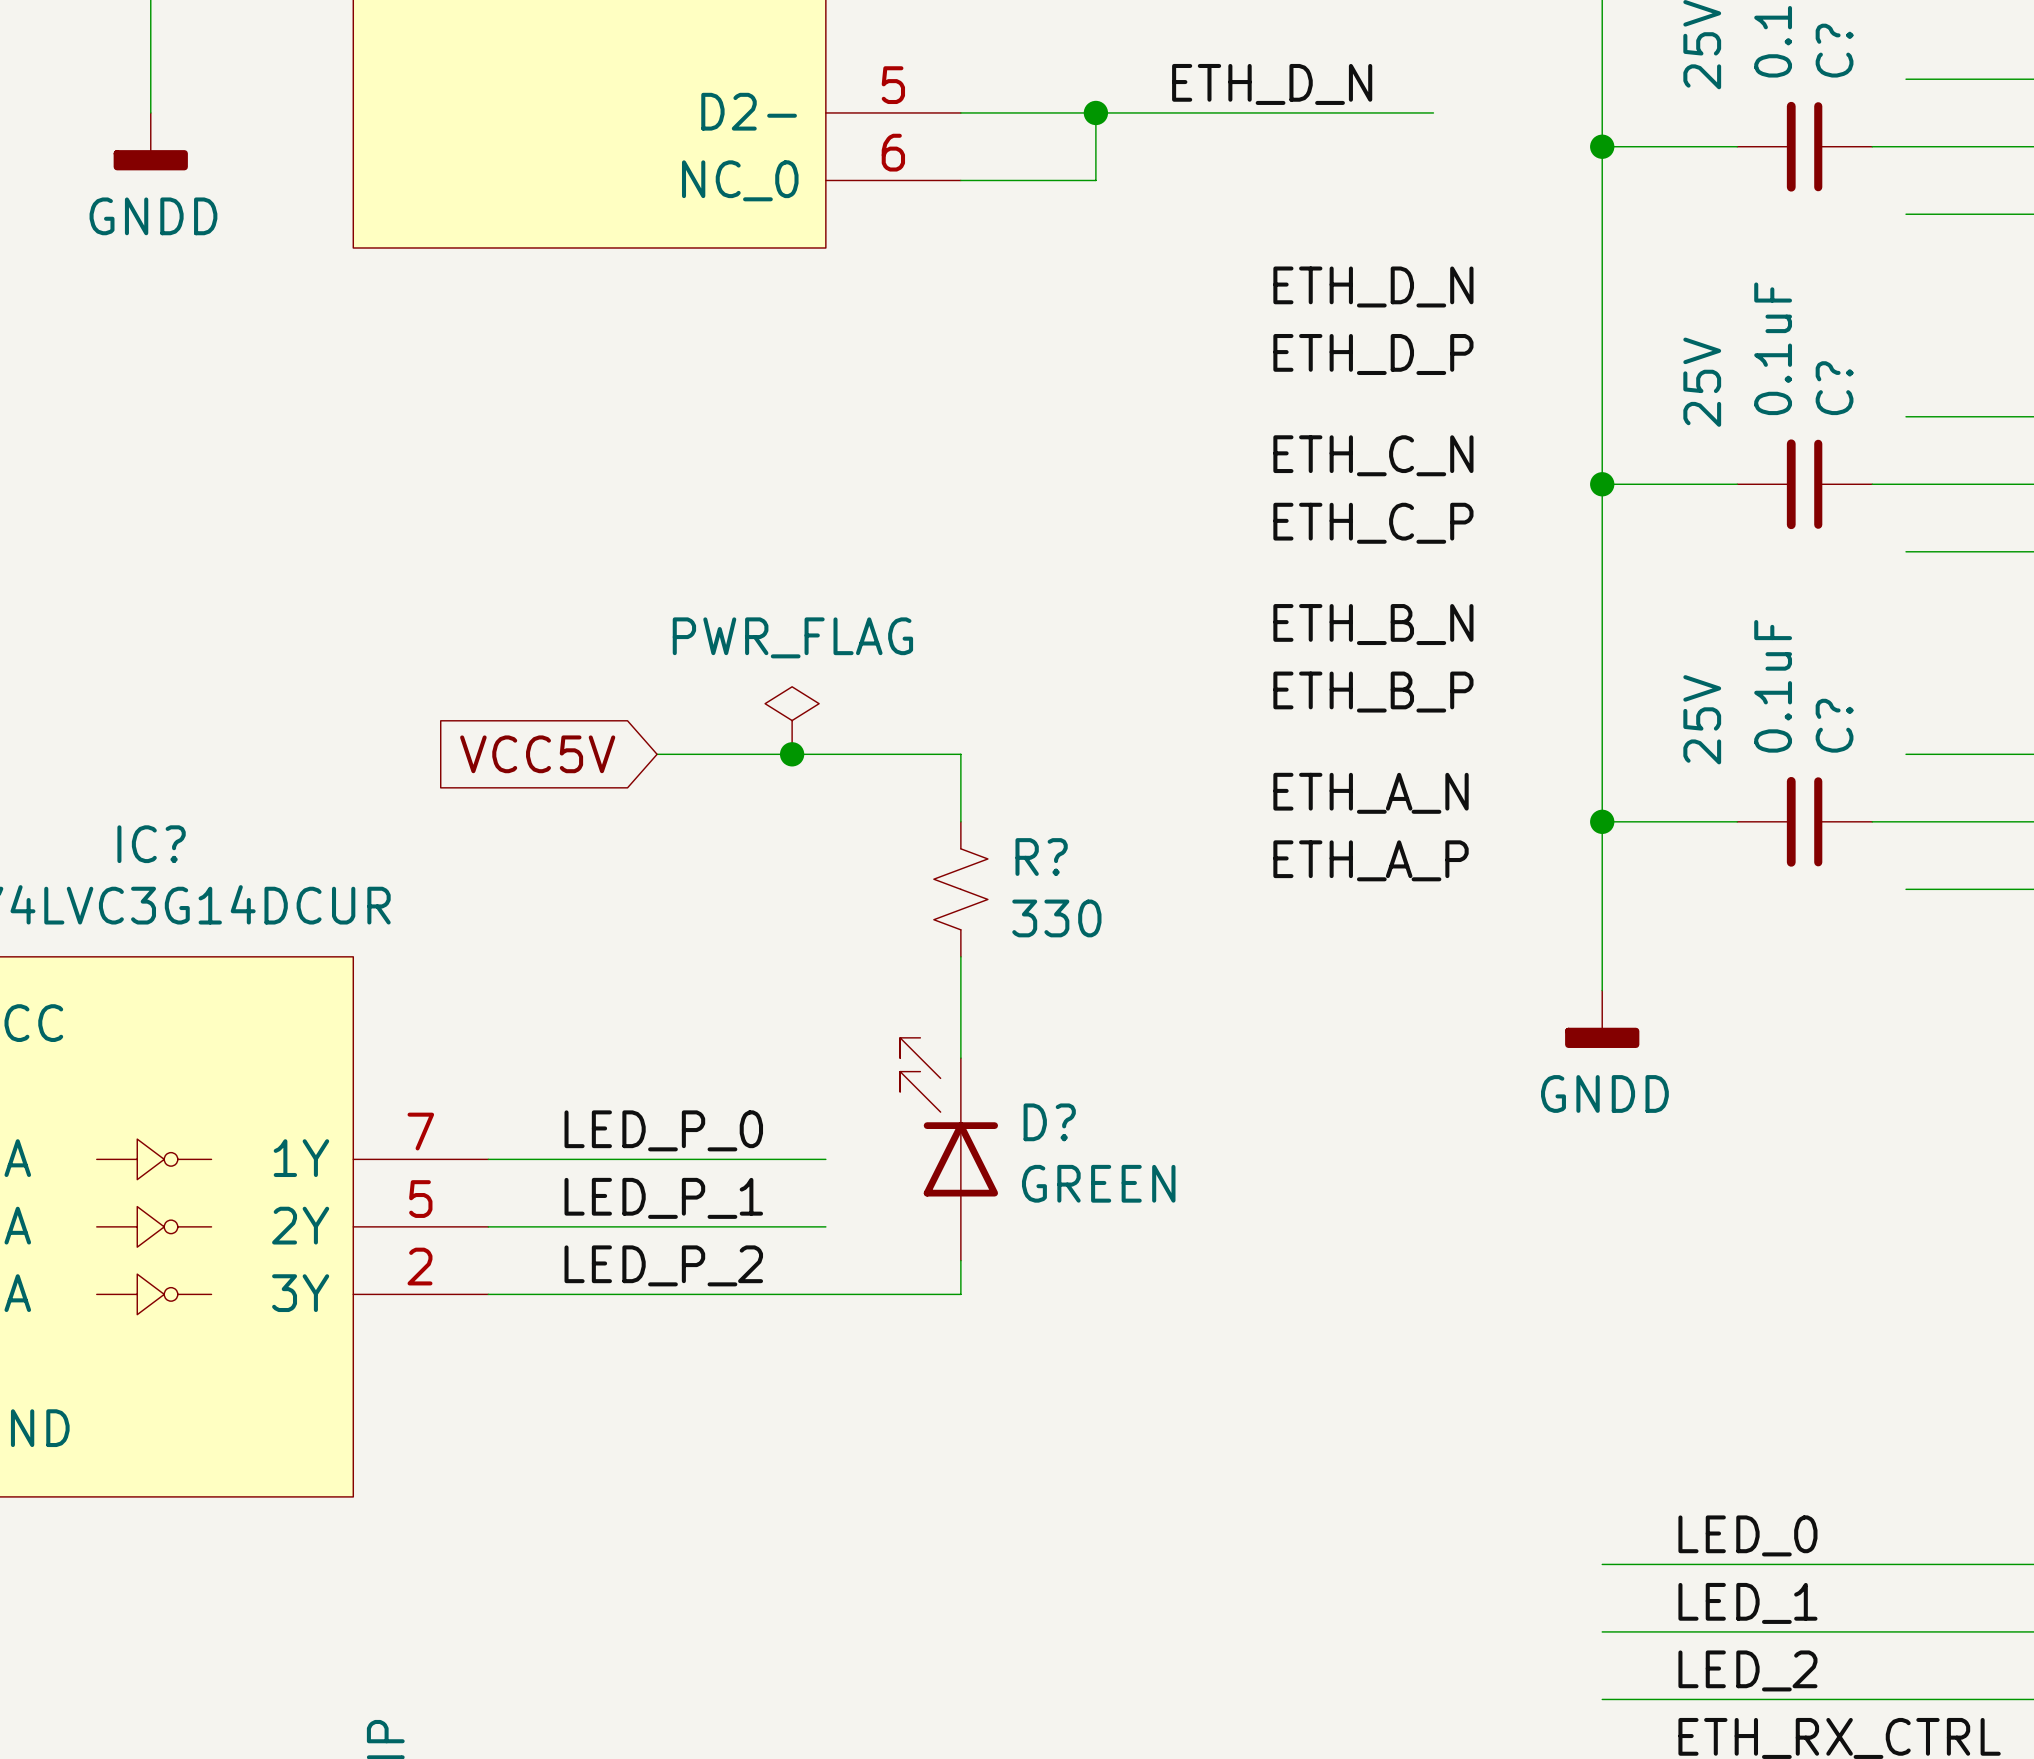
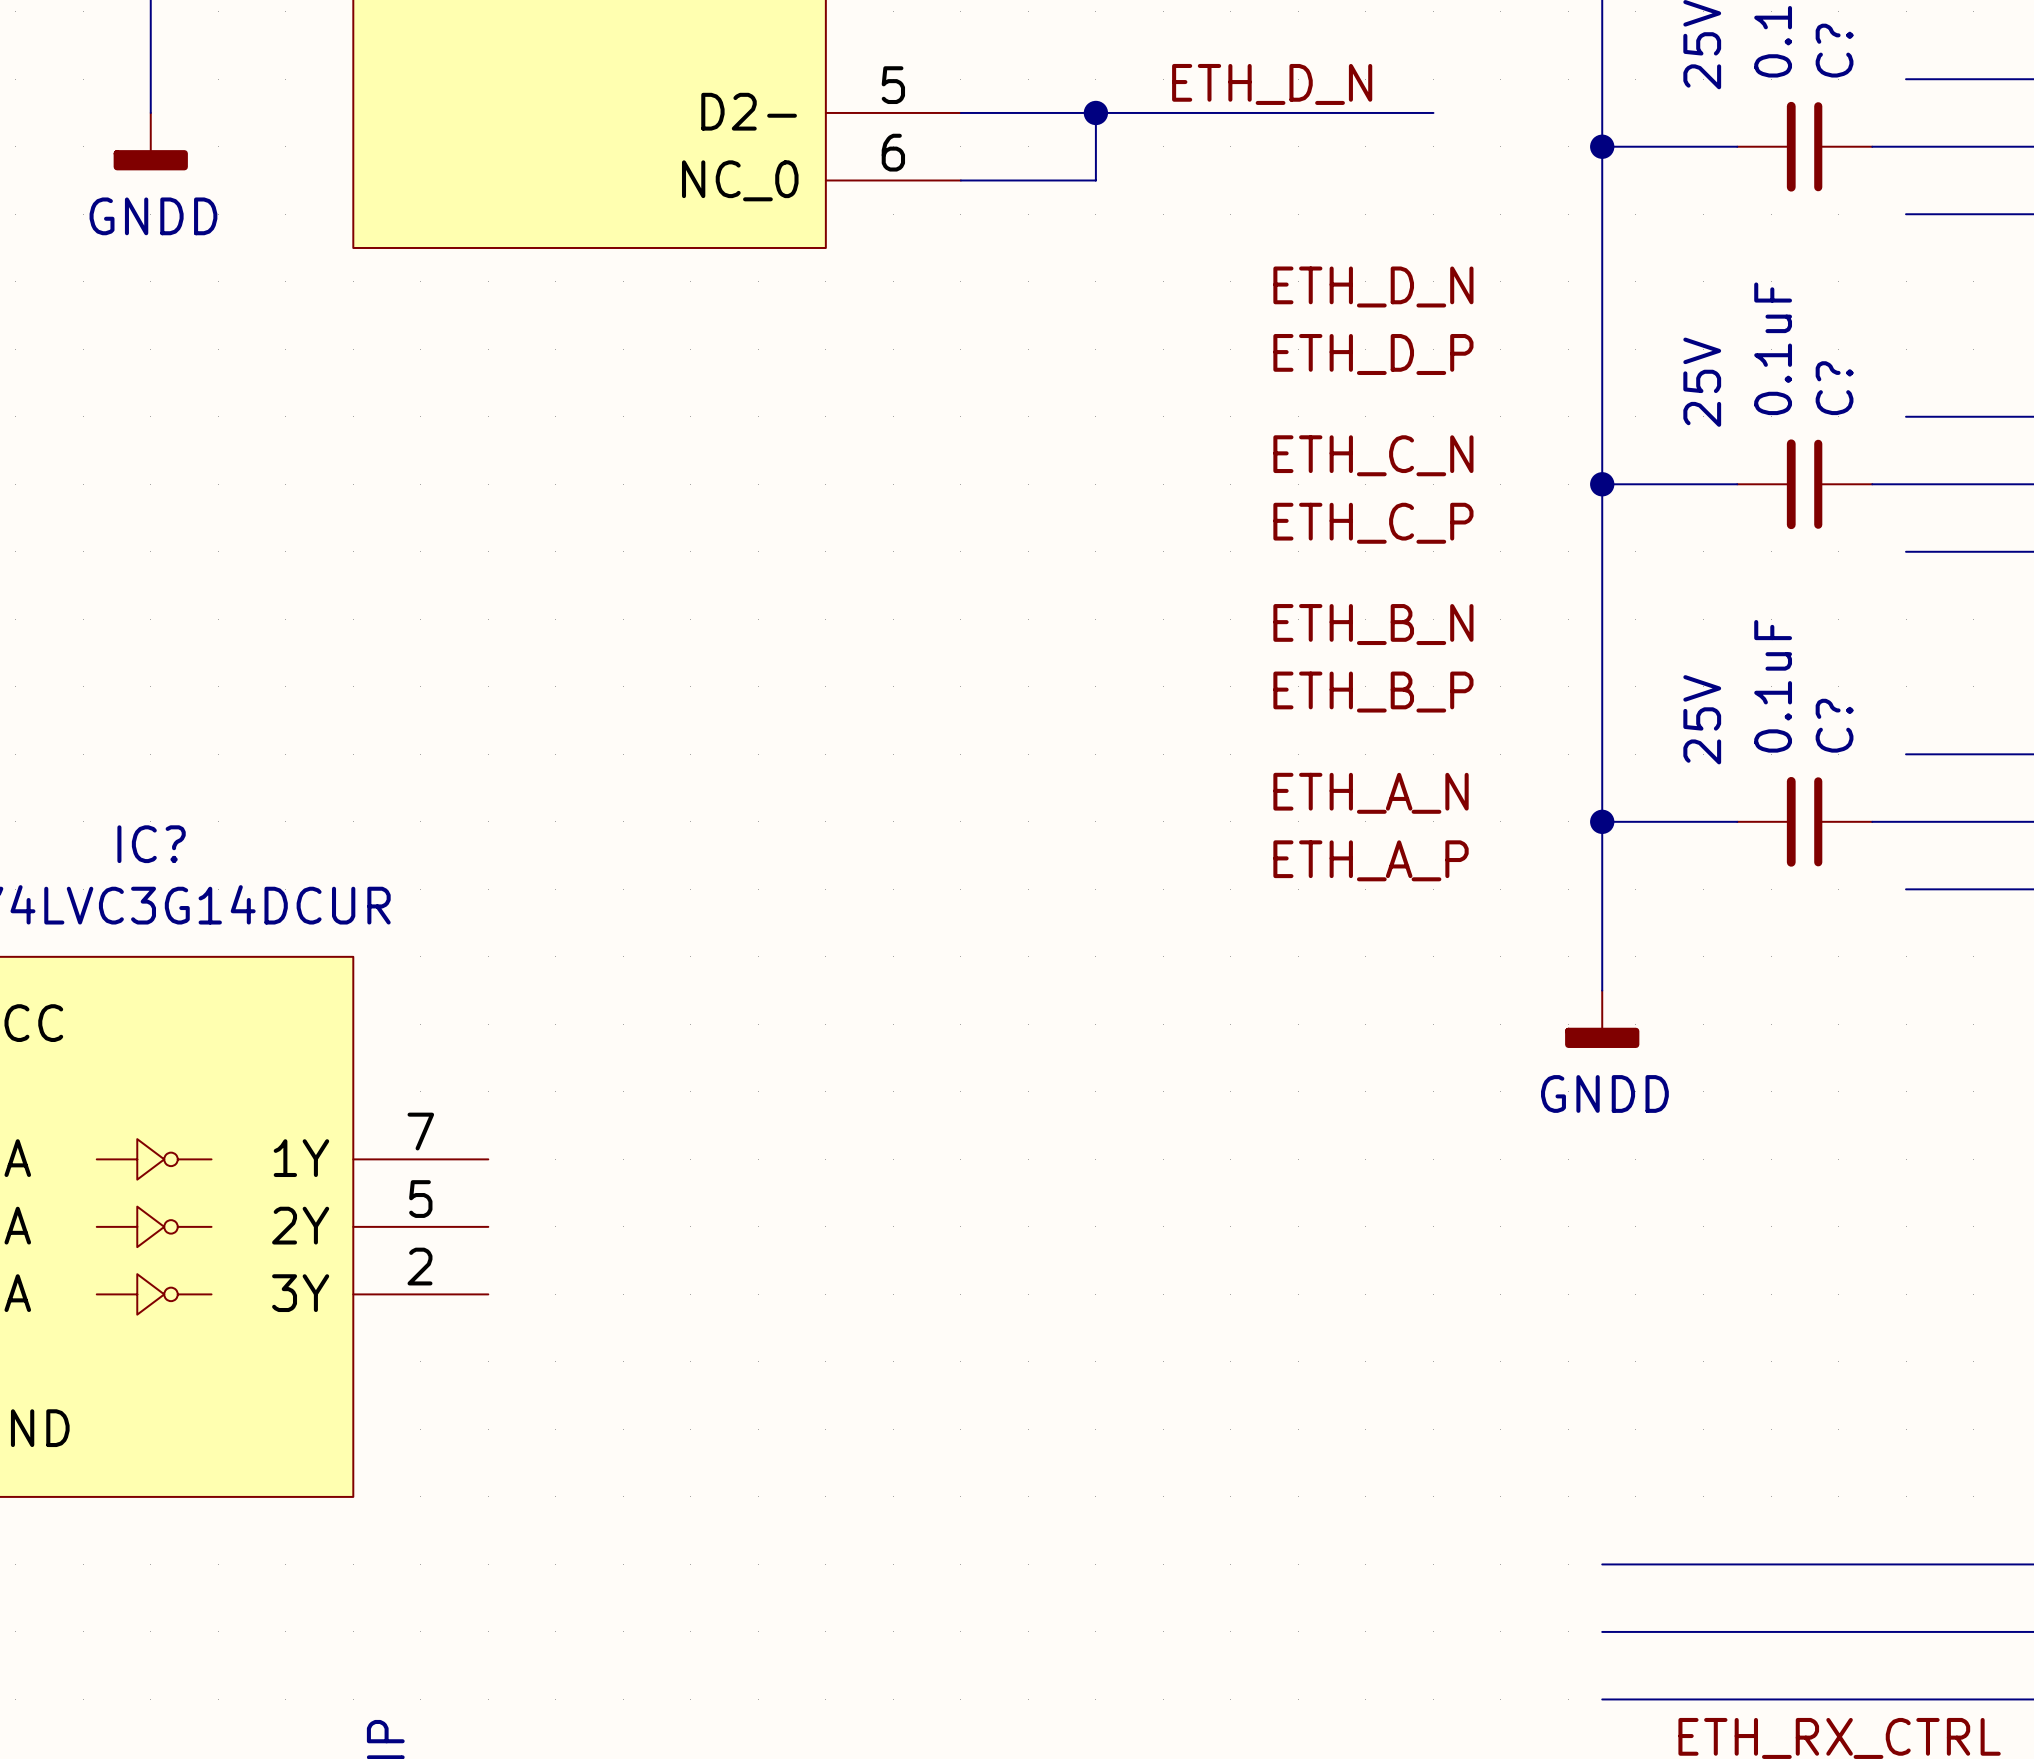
power symbol: PWR_FLAG (792, 720) -> none
global label: VCC5V (537, 754) -> none
wire: (657, 754) (960, 754) (960, 821) -> none
junction: (792, 754) -> none
R?: 330 (960, 889) -> none
wire: (960, 956) (960, 1058) -> none
label: LED_P_0 (663, 1130) -> none
D?: GREEN (949, 1149) -> none
wire: (488, 1159) (825, 1159) -> none
label: LED_P_1 (663, 1198) -> none
wire: (488, 1226) (825, 1226) -> none
wire: (960, 1260) (960, 1294) (488, 1294) -> none
label: LED_P_2 (663, 1265) -> none
label: LED_0 (1747, 1535) -> none
label: LED_1 (1747, 1603) -> none
label: LED_2 (1747, 1670) -> none

